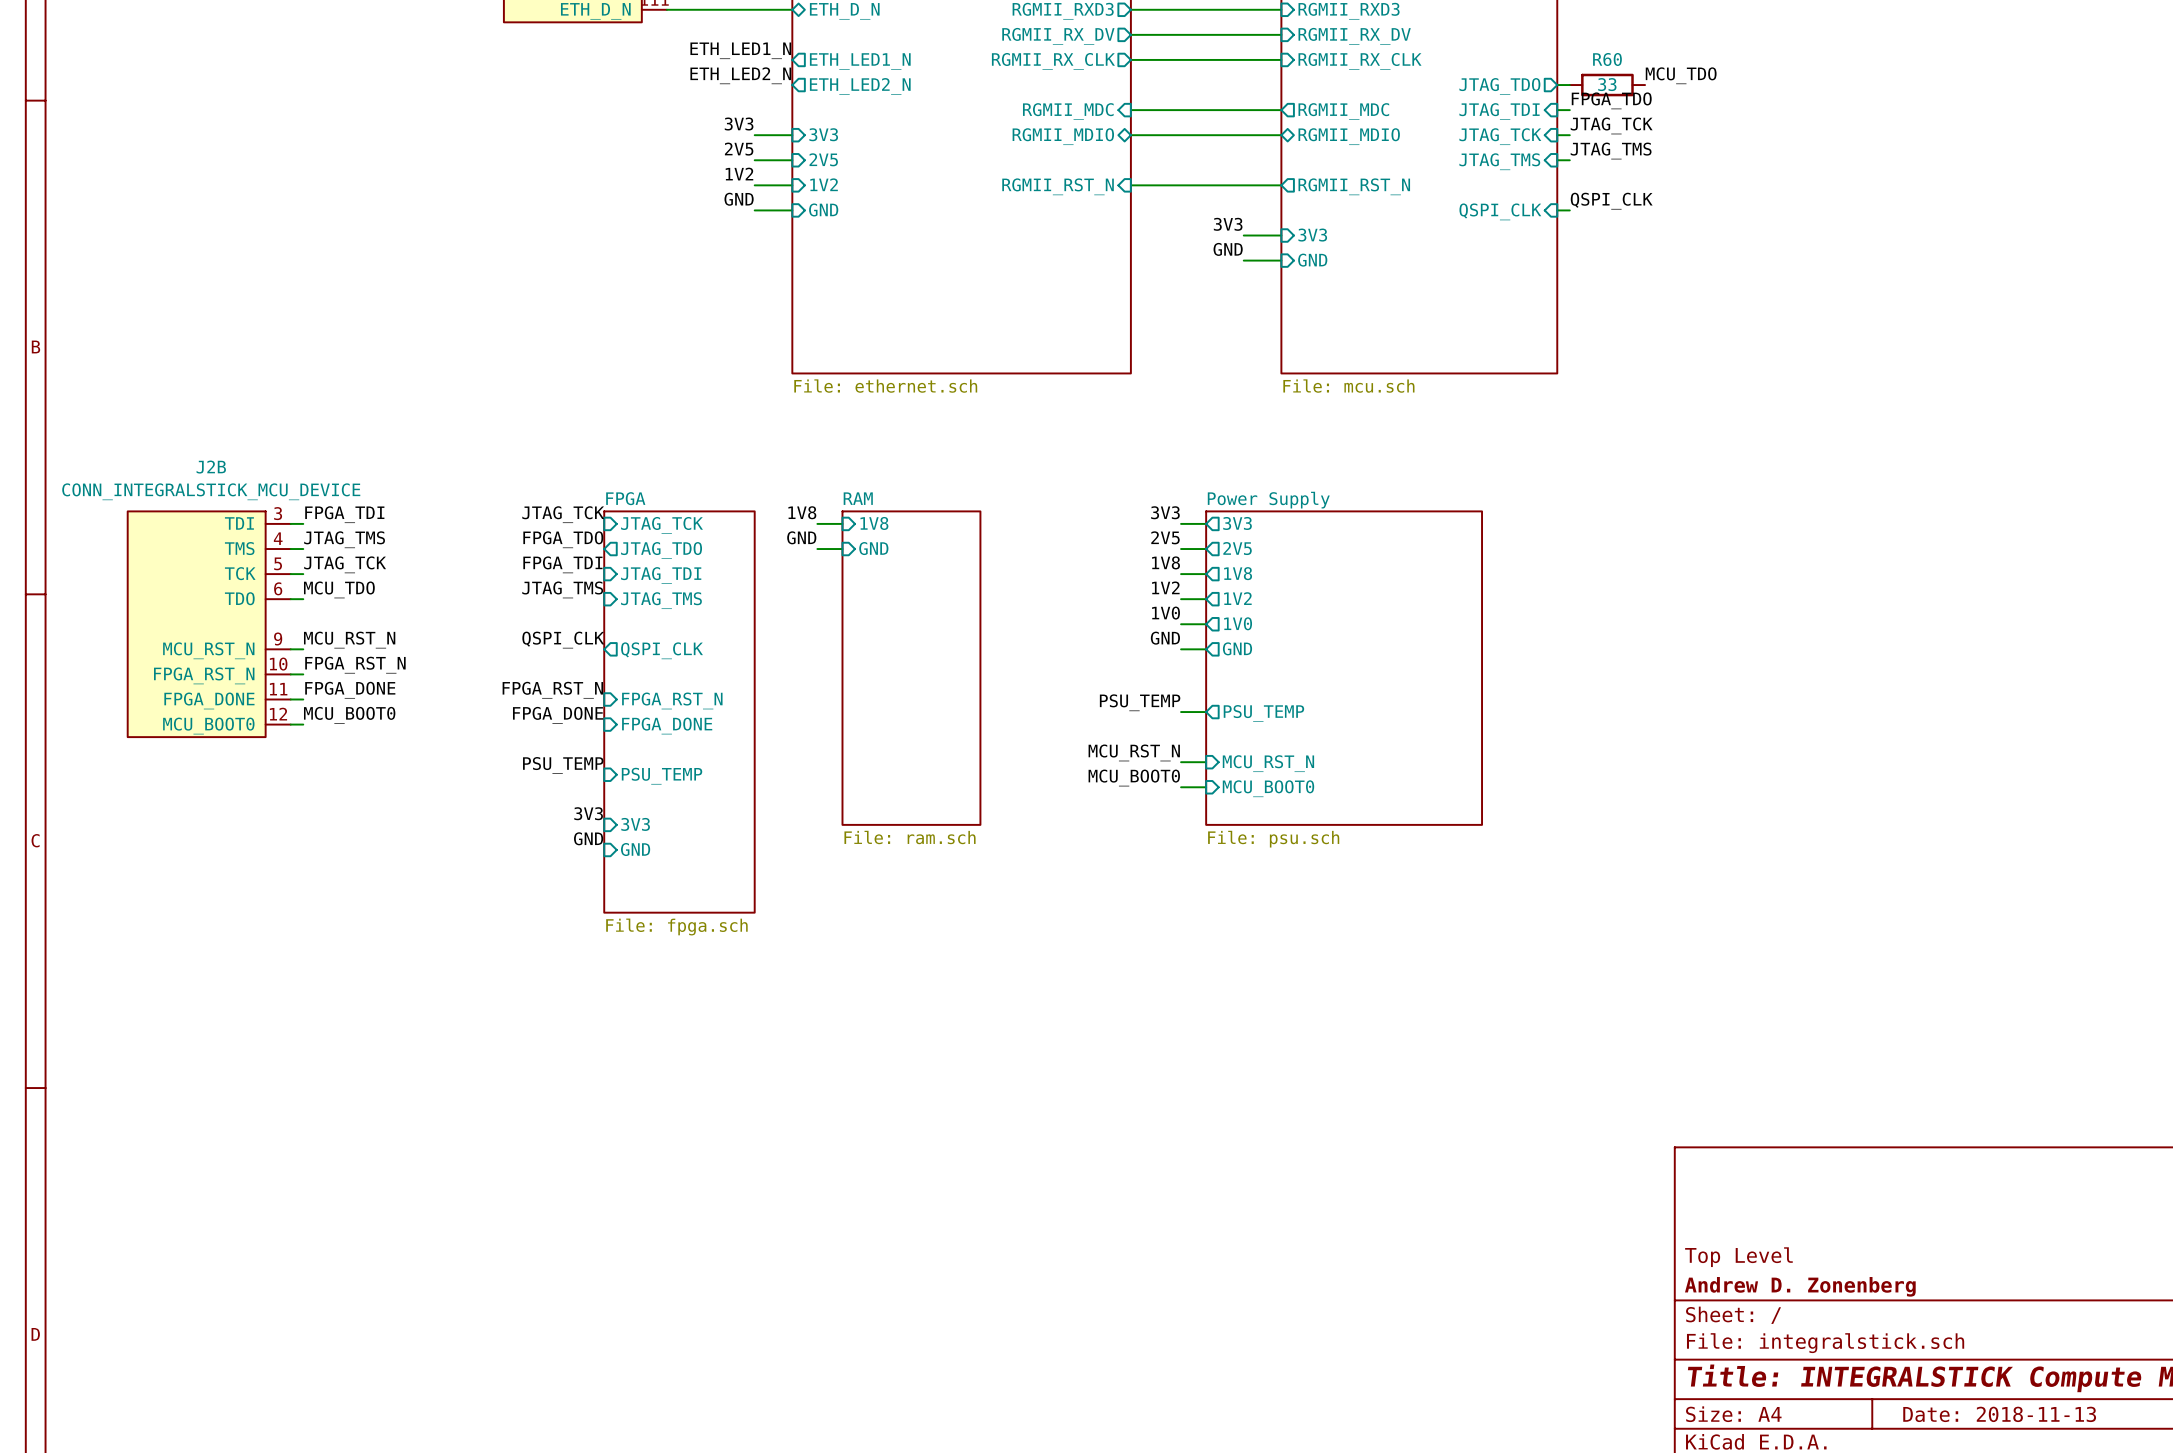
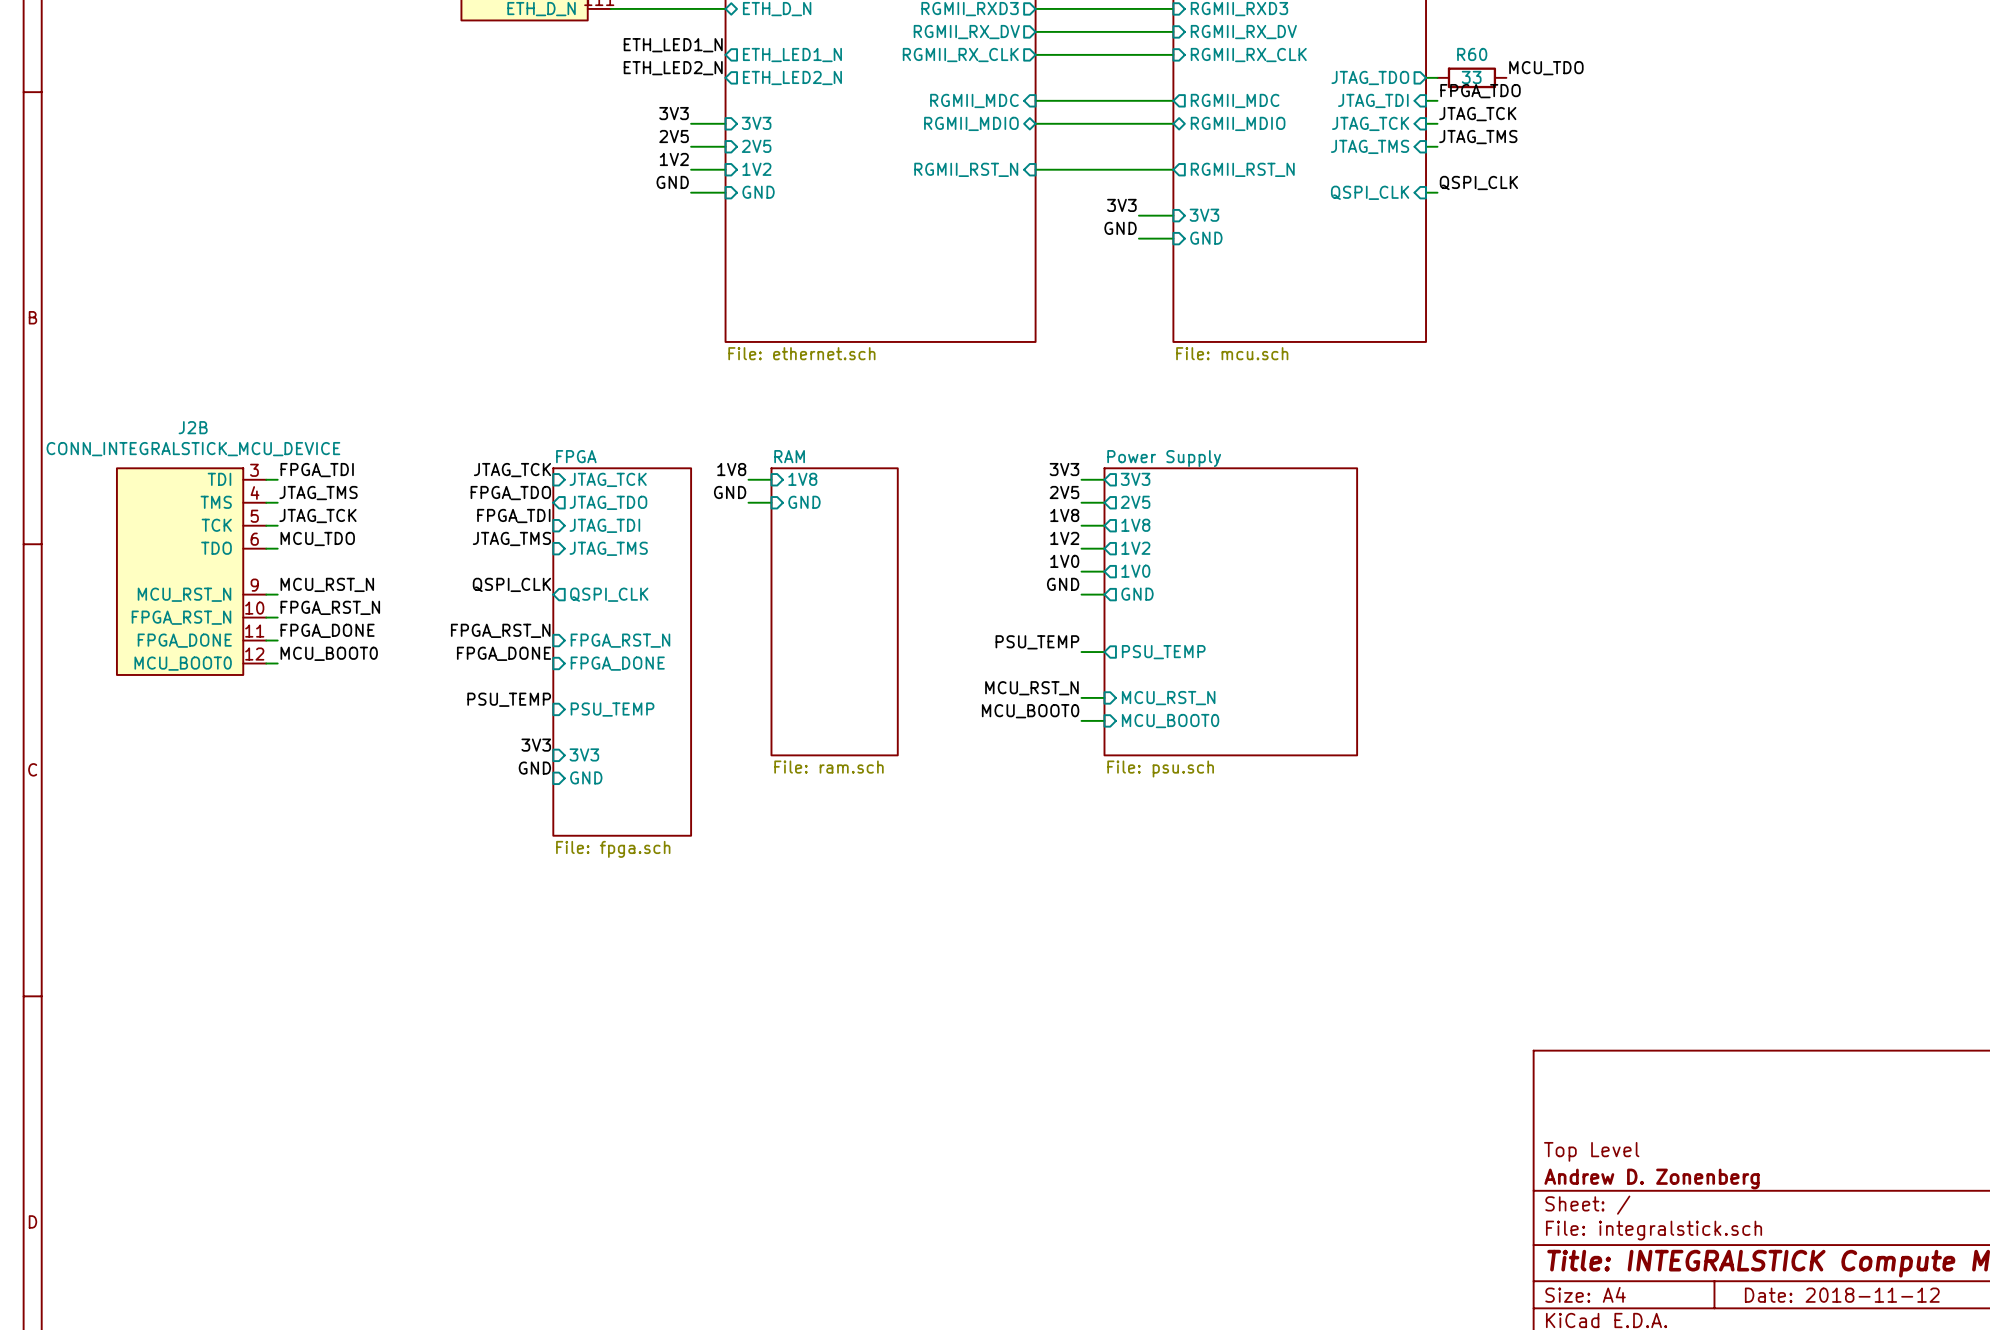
title block: Date: 2018-11-13 (1999, 1414) -> Date: 2018-11-12 (1842, 1295)

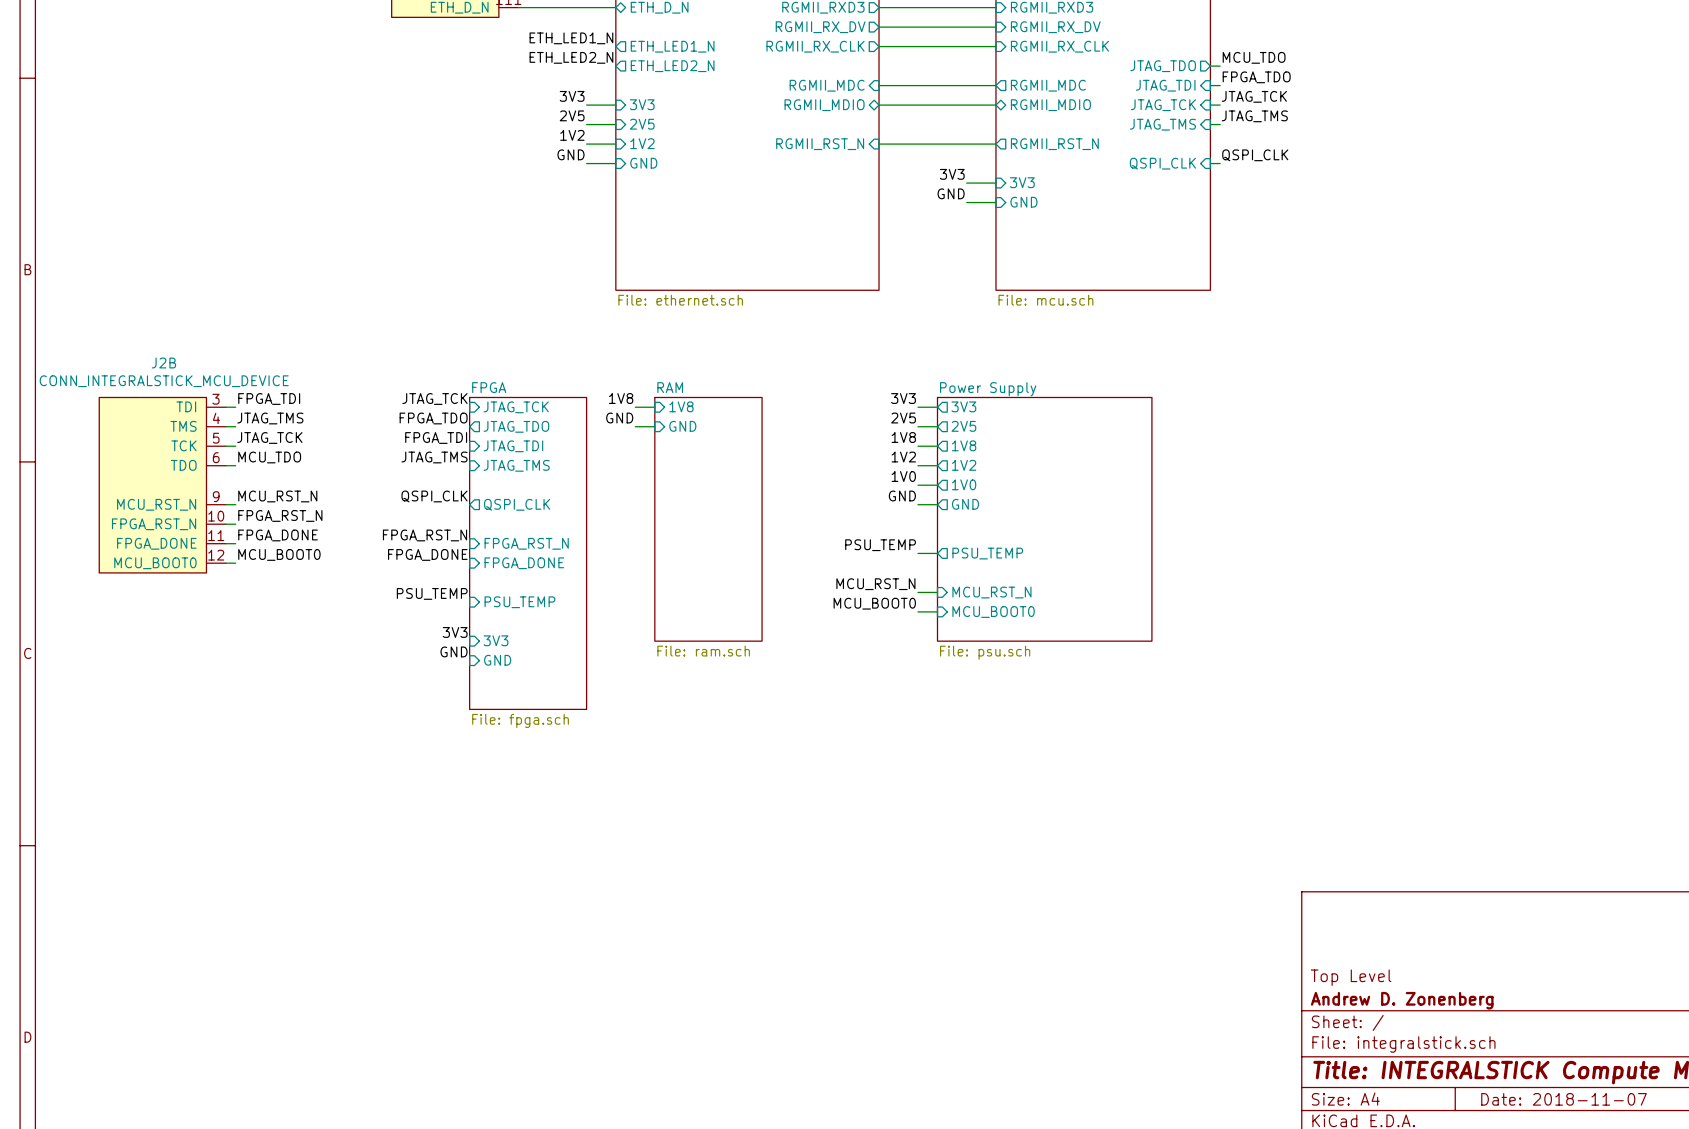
label position: MCU_TDO (1546, 68) -> MCU_TDO (1254, 57)
R60: 33 (1471, 77) -> none
title block: Date: 2018-11-12 (1842, 1295) -> Date: 2018-11-07 (1564, 1099)

